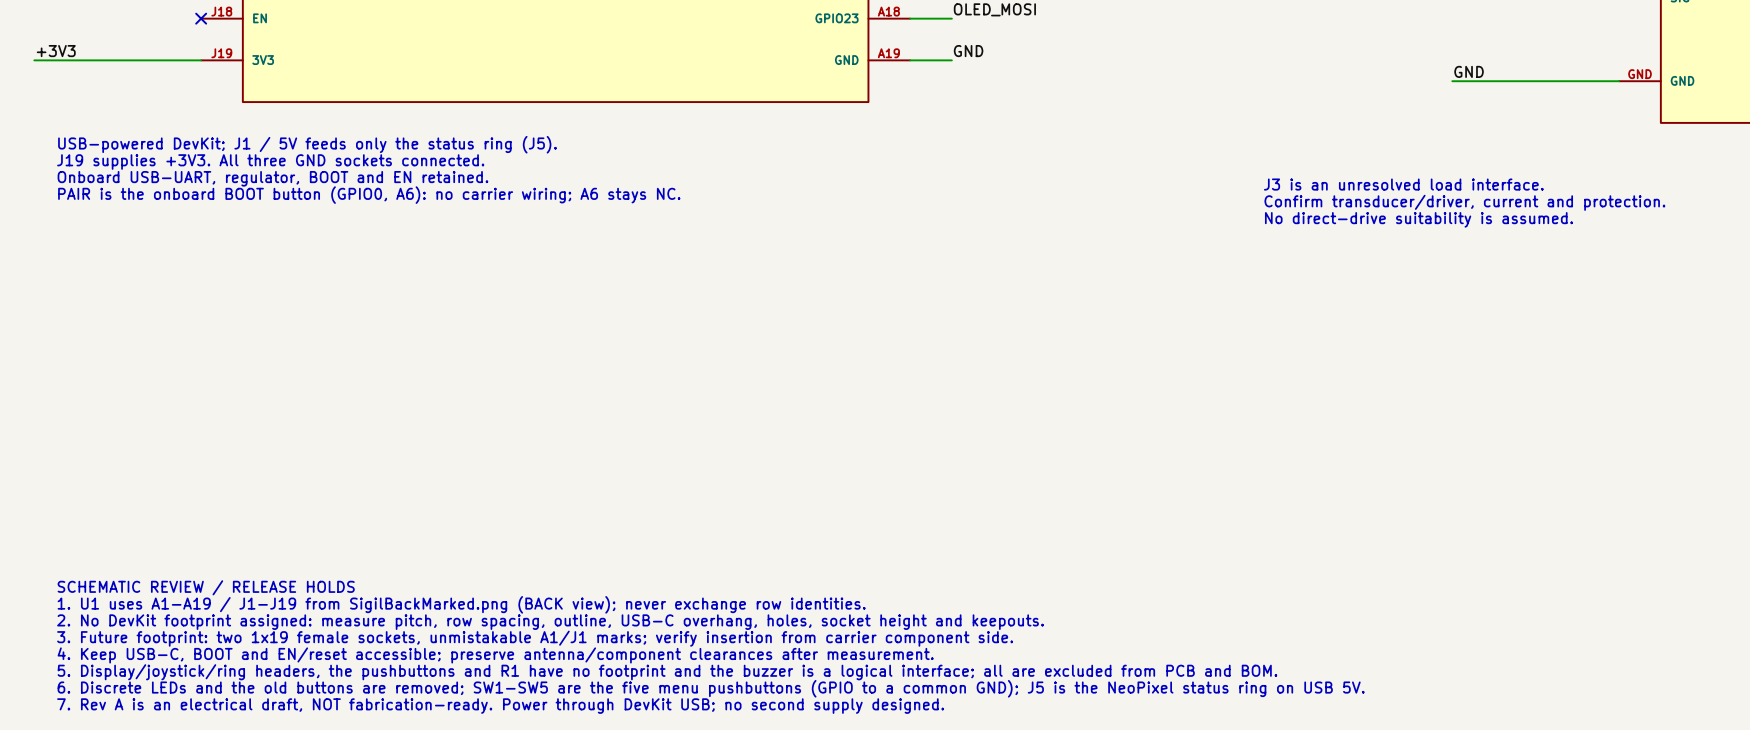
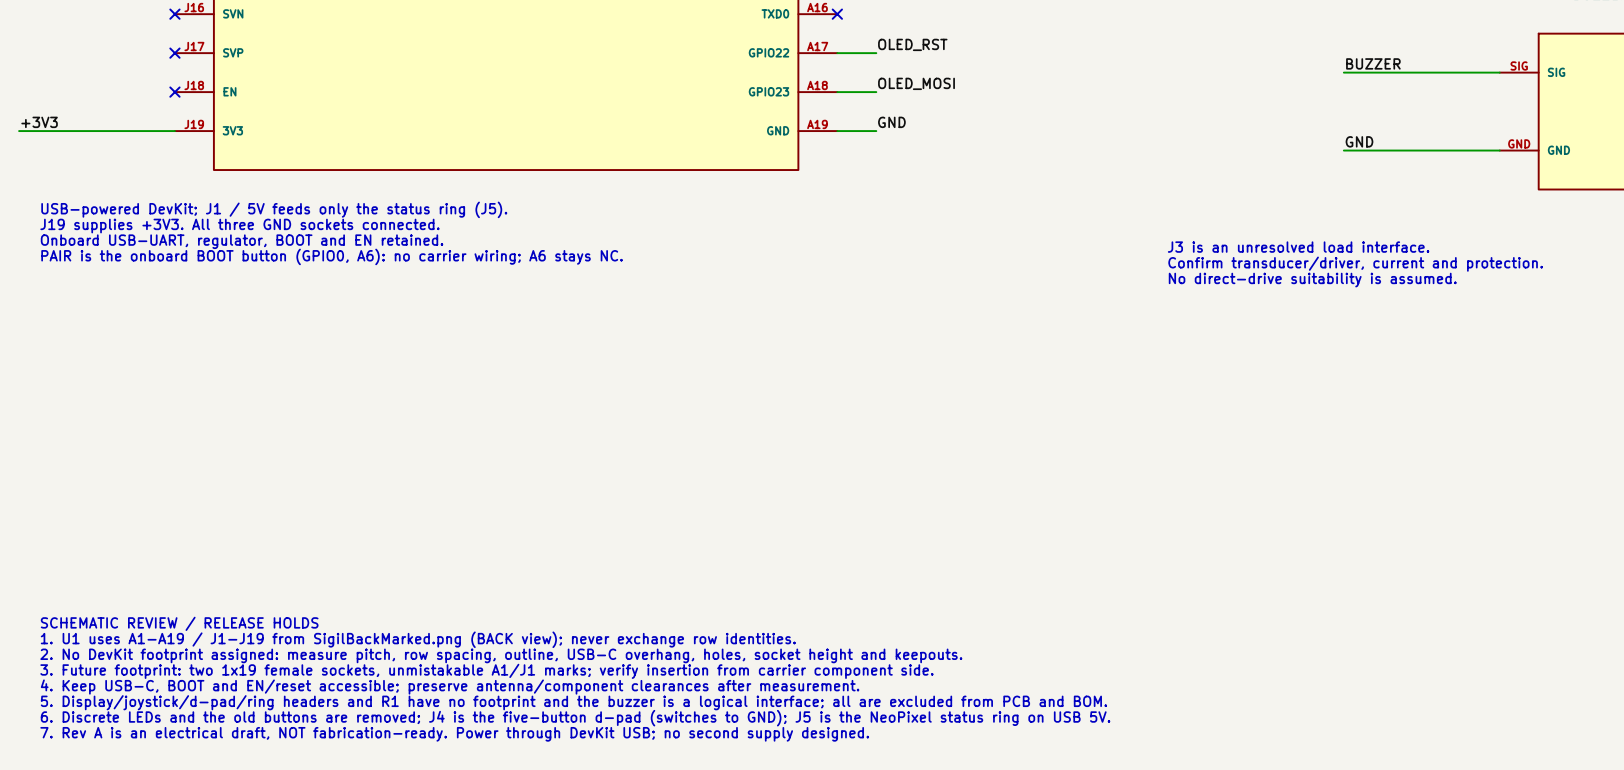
text: 5. Display/joystick/ring headers, the pushbuttons and R1 have no footprint and the buzzer is a logical interface; all are excluded from PCB and BOM. (667, 672) -> 5. Display/joystick/d-pad/ring headers and R1 have no footprint and the buzzer is a logical interface; all are excluded from PCB and BOM. (573, 702)
text: 6. Discrete LEDs and the old buttons are removed; SW1-SW5 are the five menu pushbuttons (GPIO to a common GND); J5 is the NeoPixel status ring on USB 5V. (711, 688) -> 6. Discrete LEDs and the old buttons are removed; J4 is the five-button d-pad (switches to GND); J5 is the NeoPixel status ring on USB 5V. (575, 718)

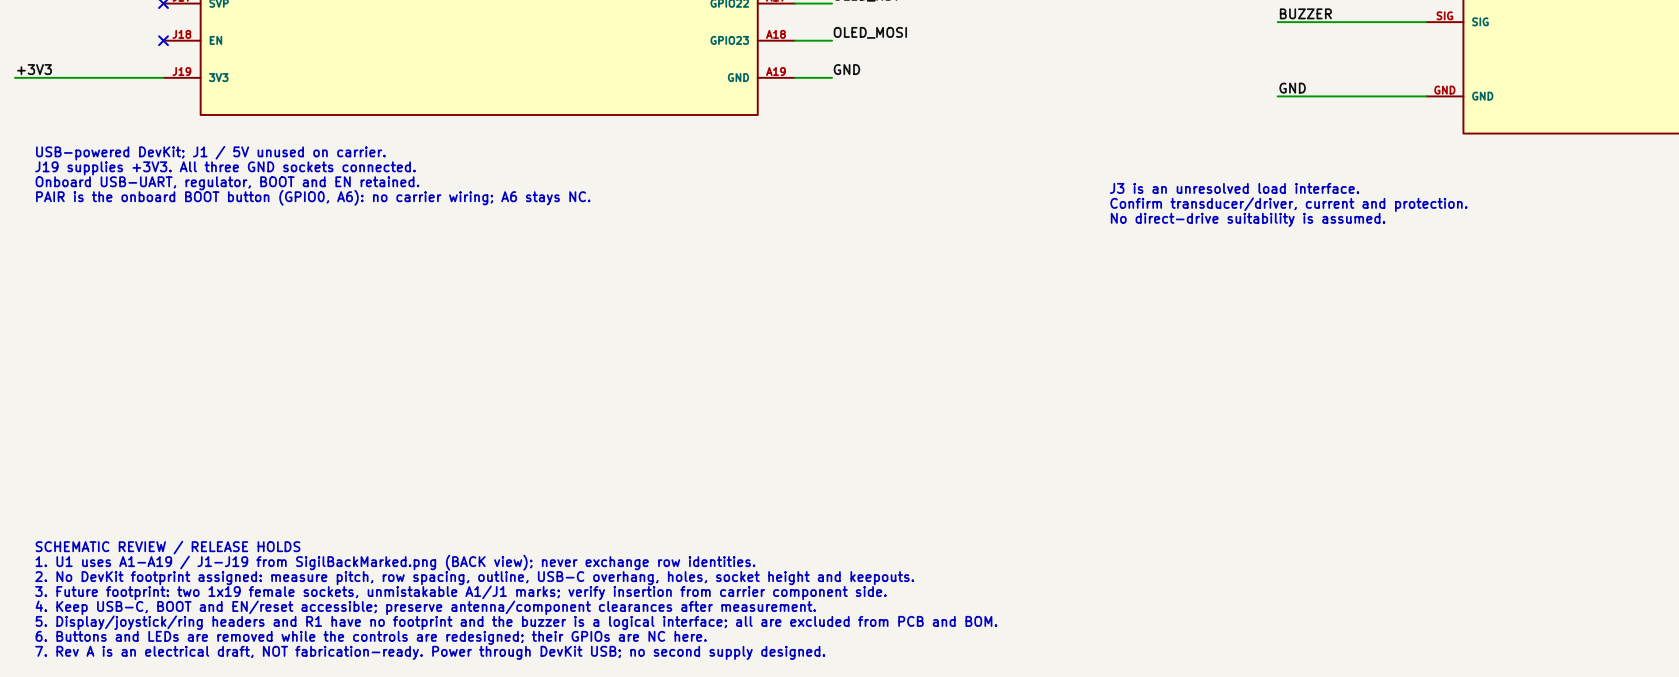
text: USB-powered DevKit; J1 / 5V feeds only the status ring (J5). (274, 209) -> USB-powered DevKit; J1 / 5V unused on carrier. (210, 153)
text: 5. Display/joystick/d-pad/ring headers and R1 have no footprint and the buzzer is a logical interface; all are excluded from PCB and BOM. (573, 702) -> 5. Display/joystick/ring headers and R1 have no footprint and the buzzer is a logical interface; all are excluded from PCB and BOM. (516, 622)
text: 6. Discrete LEDs and the old buttons are removed; J4 is the five-button d-pad (switches to GND); J5 is the NeoPixel status ring on USB 5V. (575, 718) -> 6. Buttons and LEDs are removed while the controls are redesigned; their GPIOs are NC here. (371, 637)

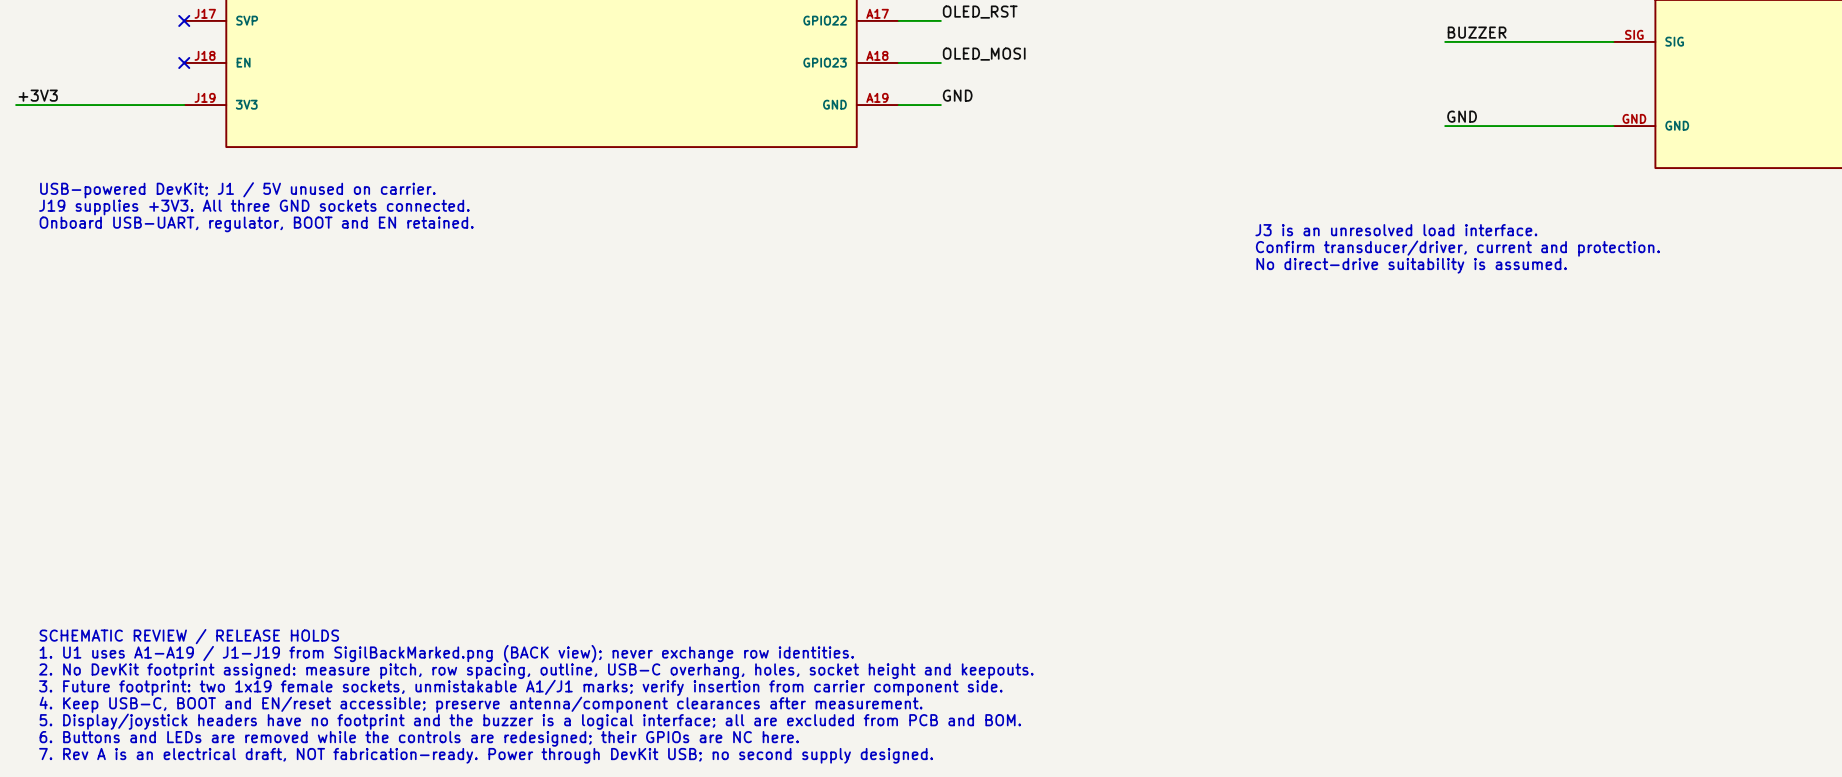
text: PAIR is the onboard BOOT button (GPIO0, A6): no carrier wiring; A6 stays NC. (313, 197) -> none
text: 5. Display/joystick/ring headers and R1 have no footprint and the buzzer is a logical interface; all are excluded from PCB and BOM. (516, 622) -> 5. Display/joystick headers have no footprint and the buzzer is a logical interface; all are excluded from PCB and BOM. (530, 721)

